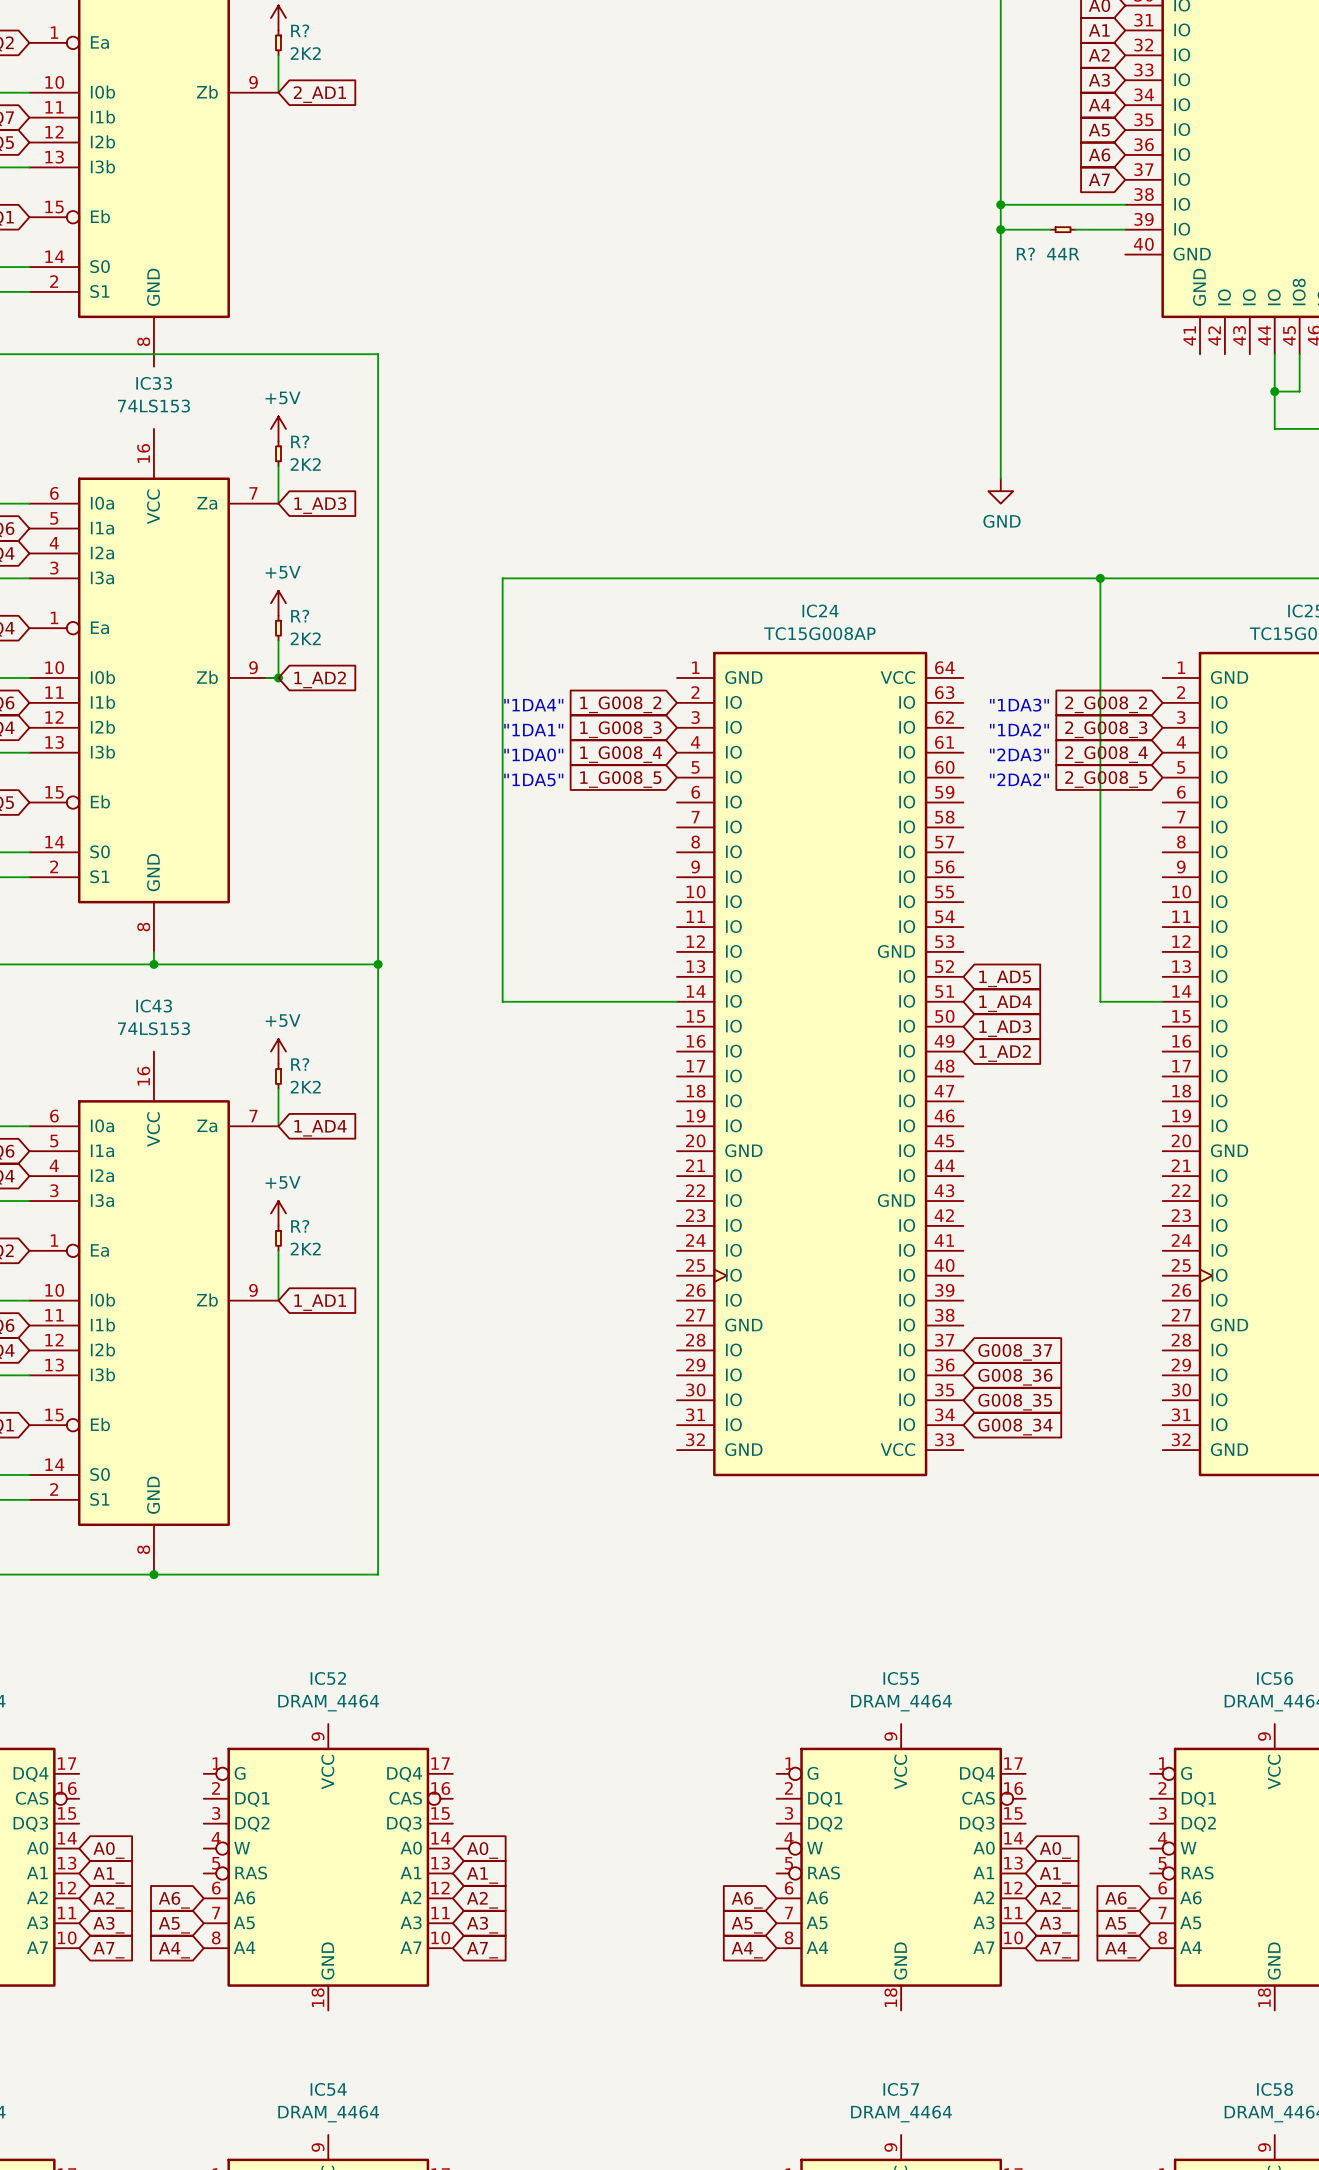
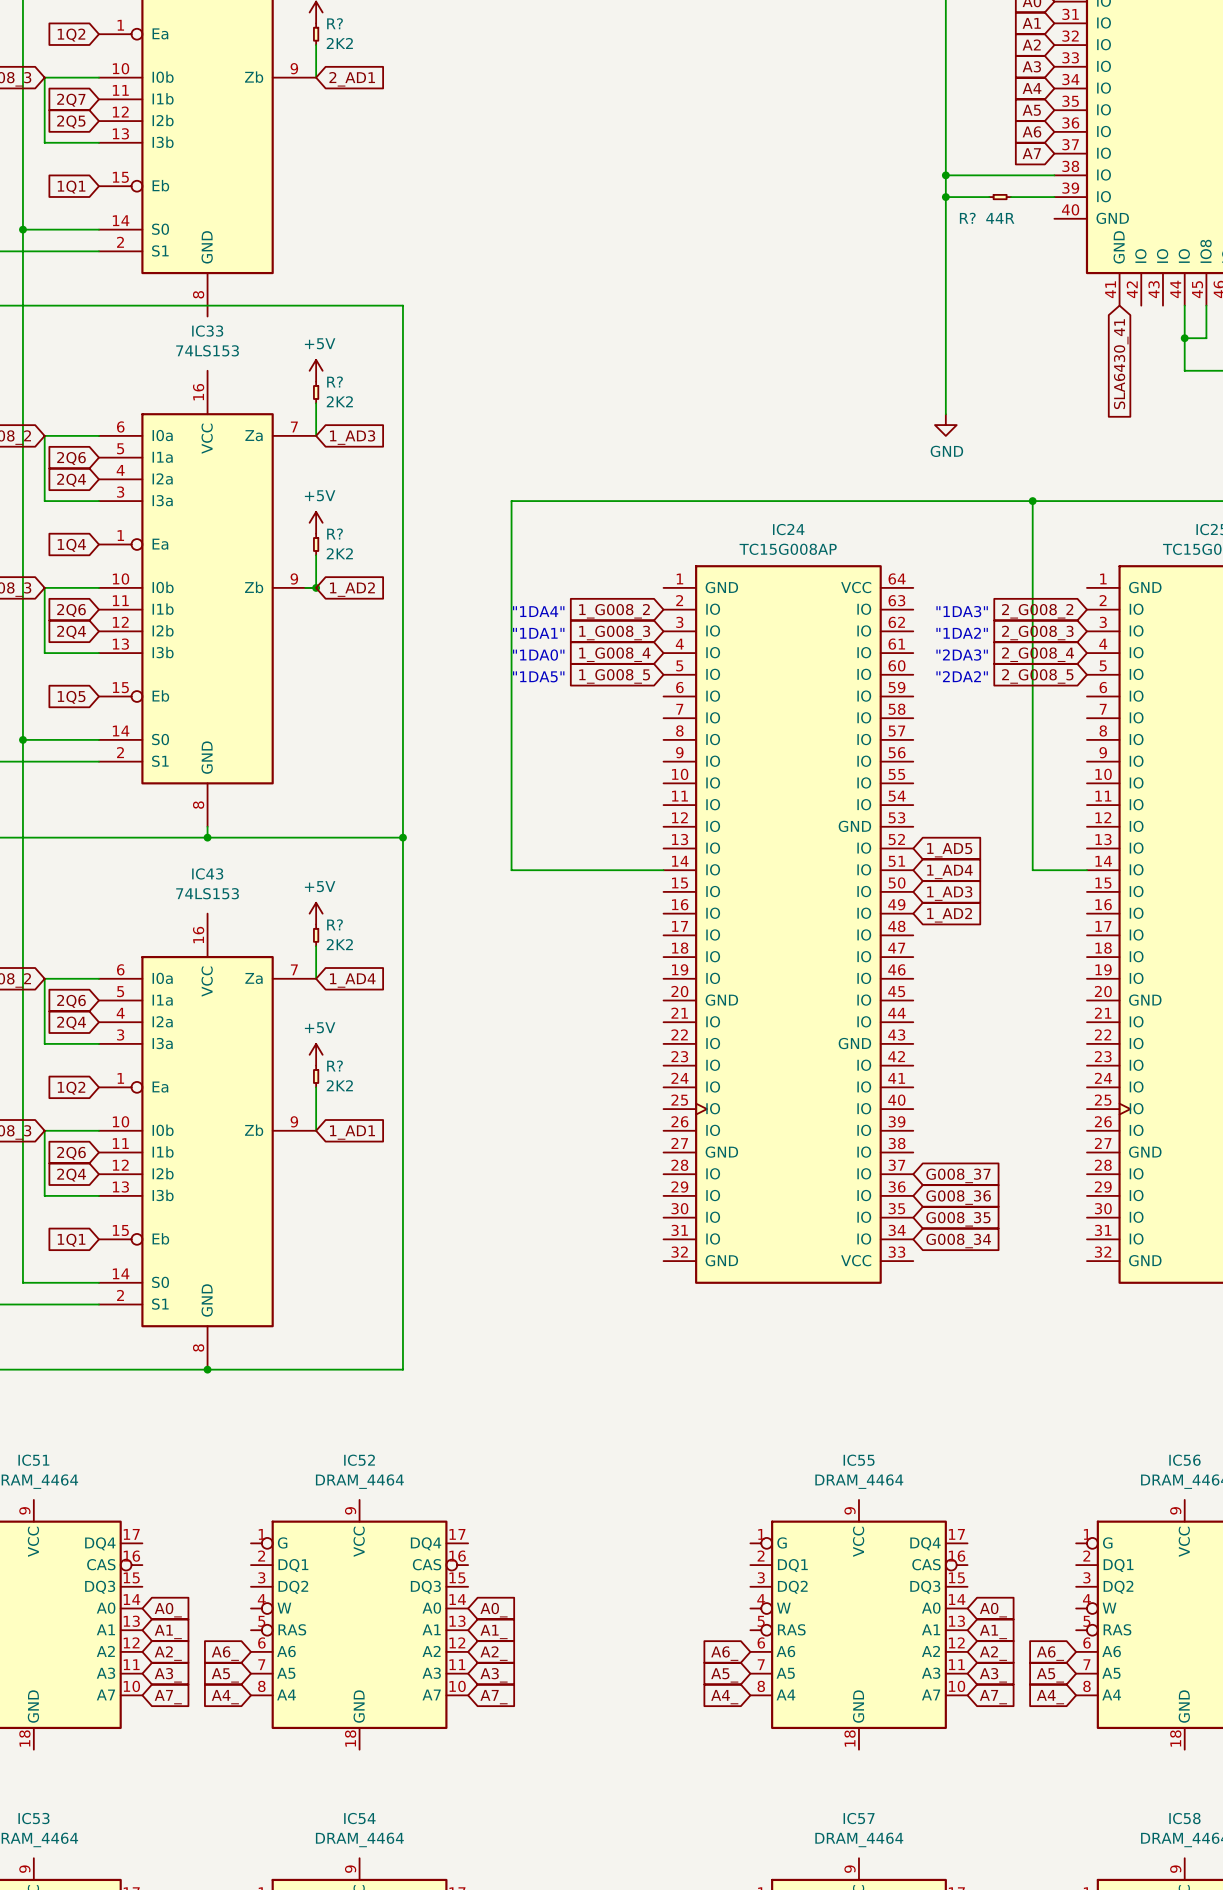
global label: none -> SLA6430_41 (1121, 364)

